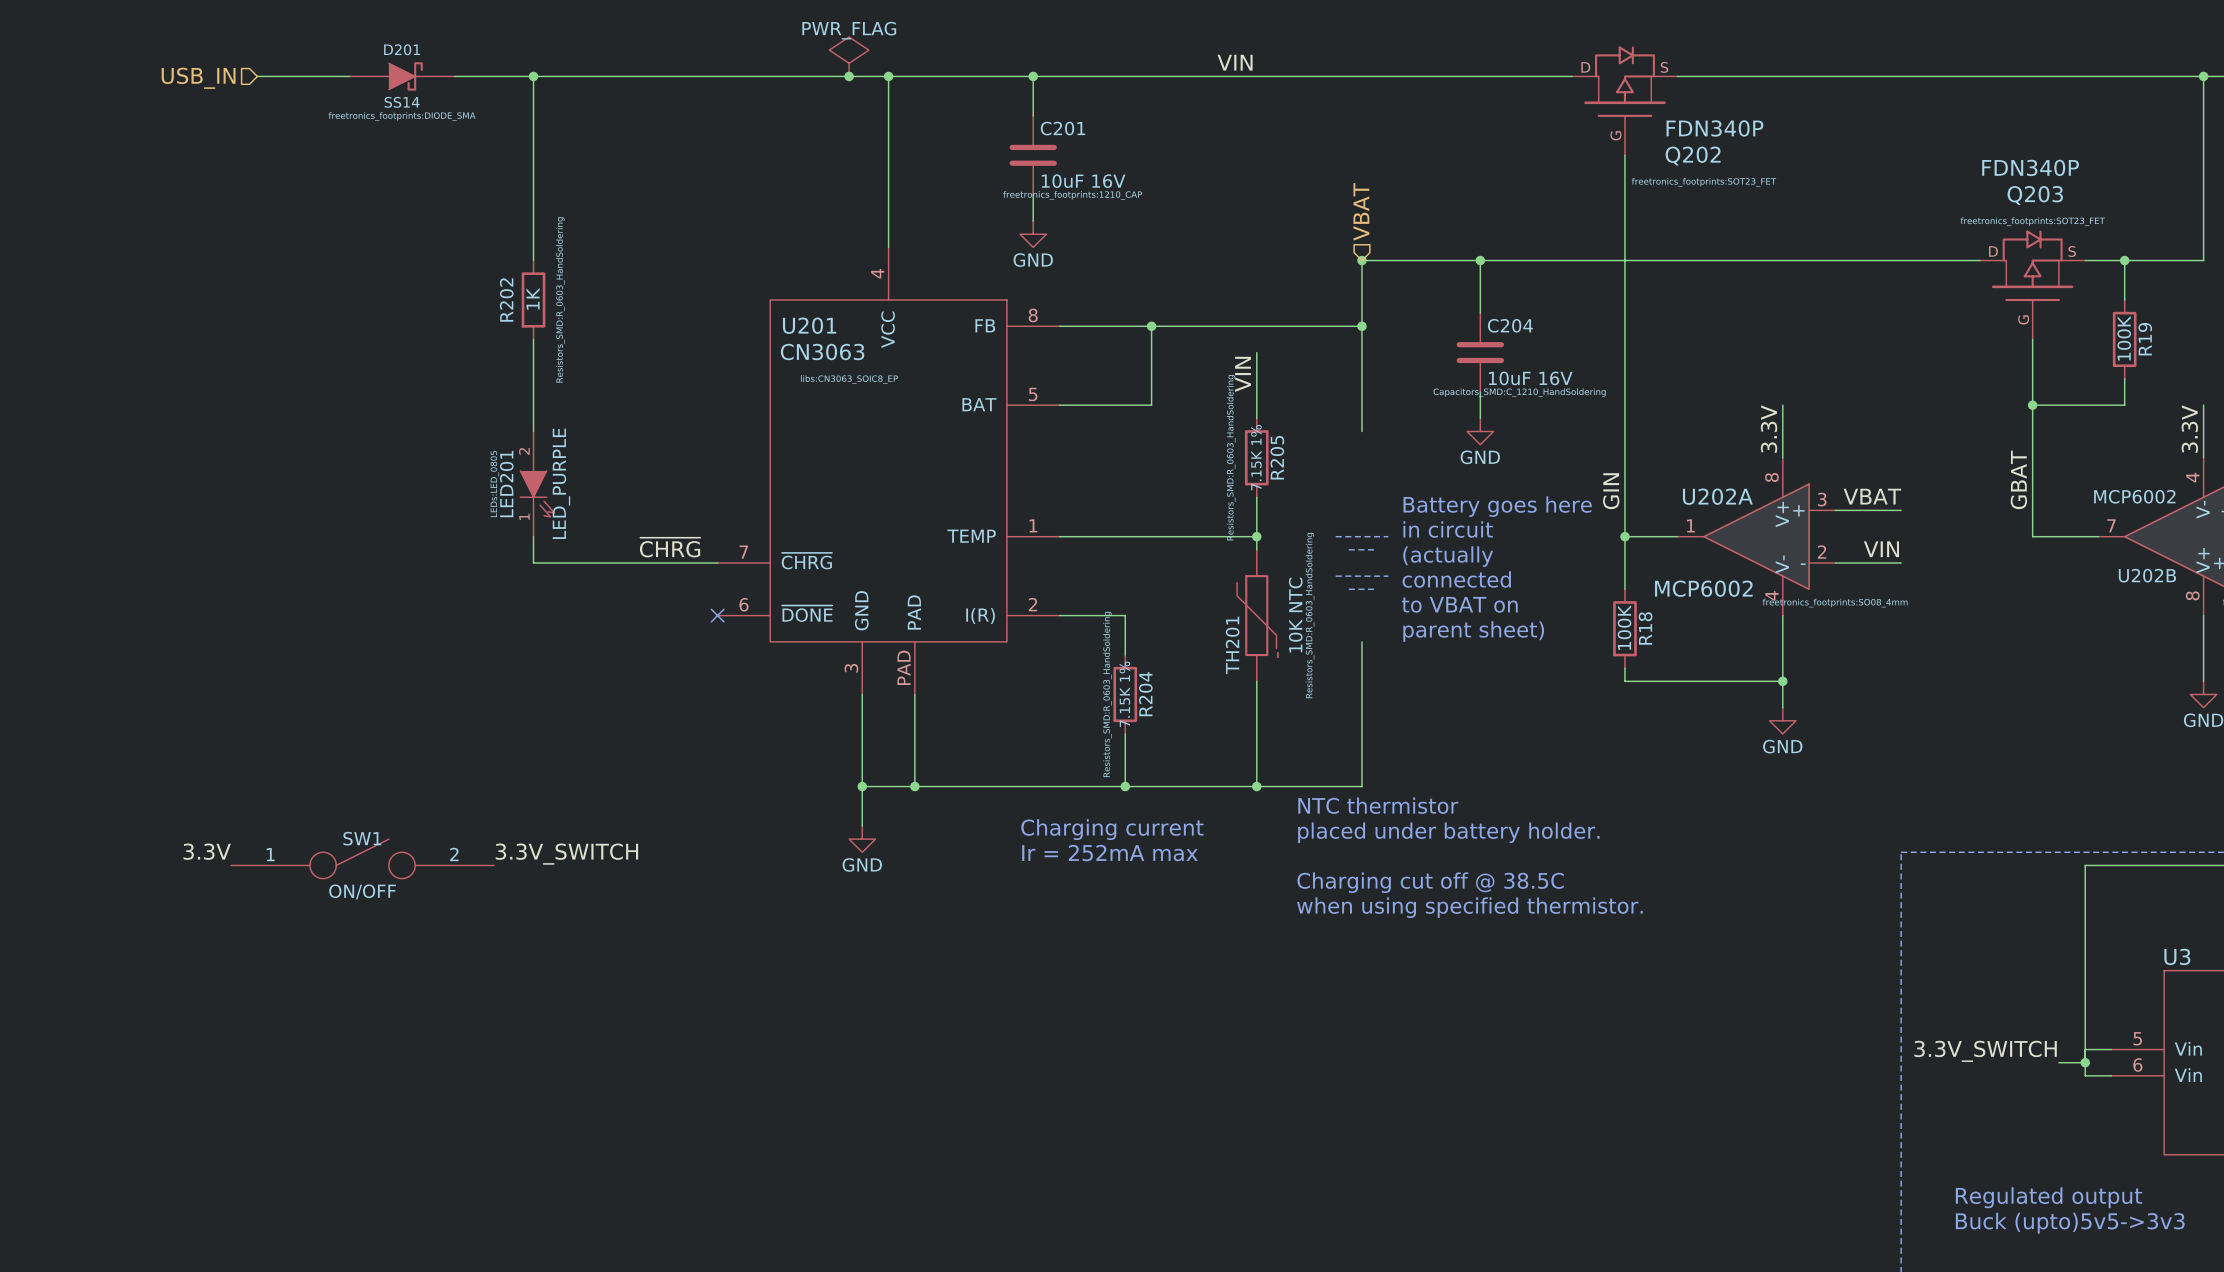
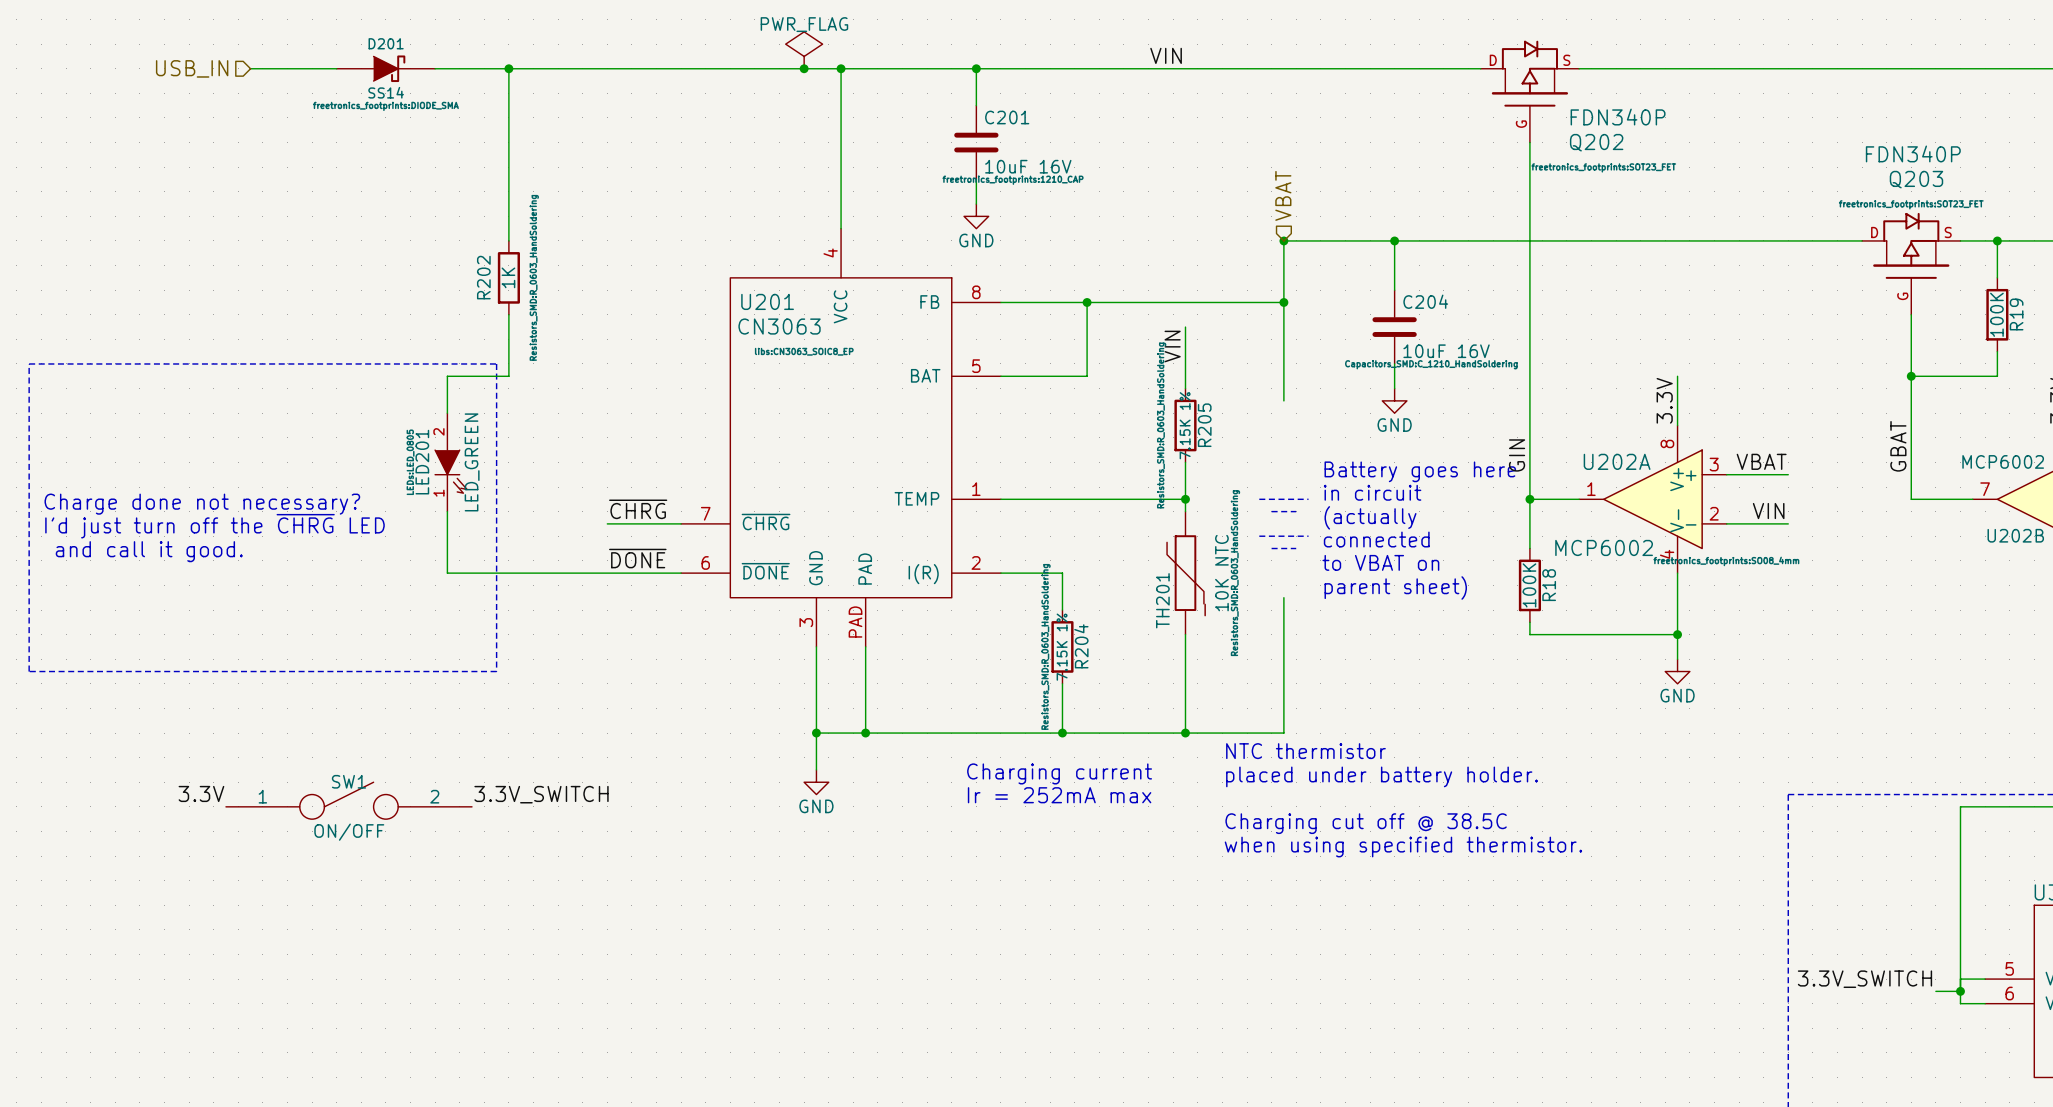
line: none -> (29, 363) (496, 363) (496, 671) (29, 671) (29, 363)
wire: (533, 405) (533, 431) -> (508, 376) (447, 376) (447, 413)
LED201 value: LED_PURPLE (561, 483) -> LED_GREEN (472, 462)
LED201 position: (537, 484) -> (451, 462)
wire: (533, 536) (533, 562) (638, 562) -> none
text: none -> Charge done not necessary? (202, 504)
wire: none -> (447, 511) (447, 573) (681, 573)
text: none -> I'd just turn off the ~{CHRG} LED (214, 526)
text: none -> and call it good. (149, 551)
label: none -> ~{DONE} (637, 558)
no-connect mark: (717, 615) -> none

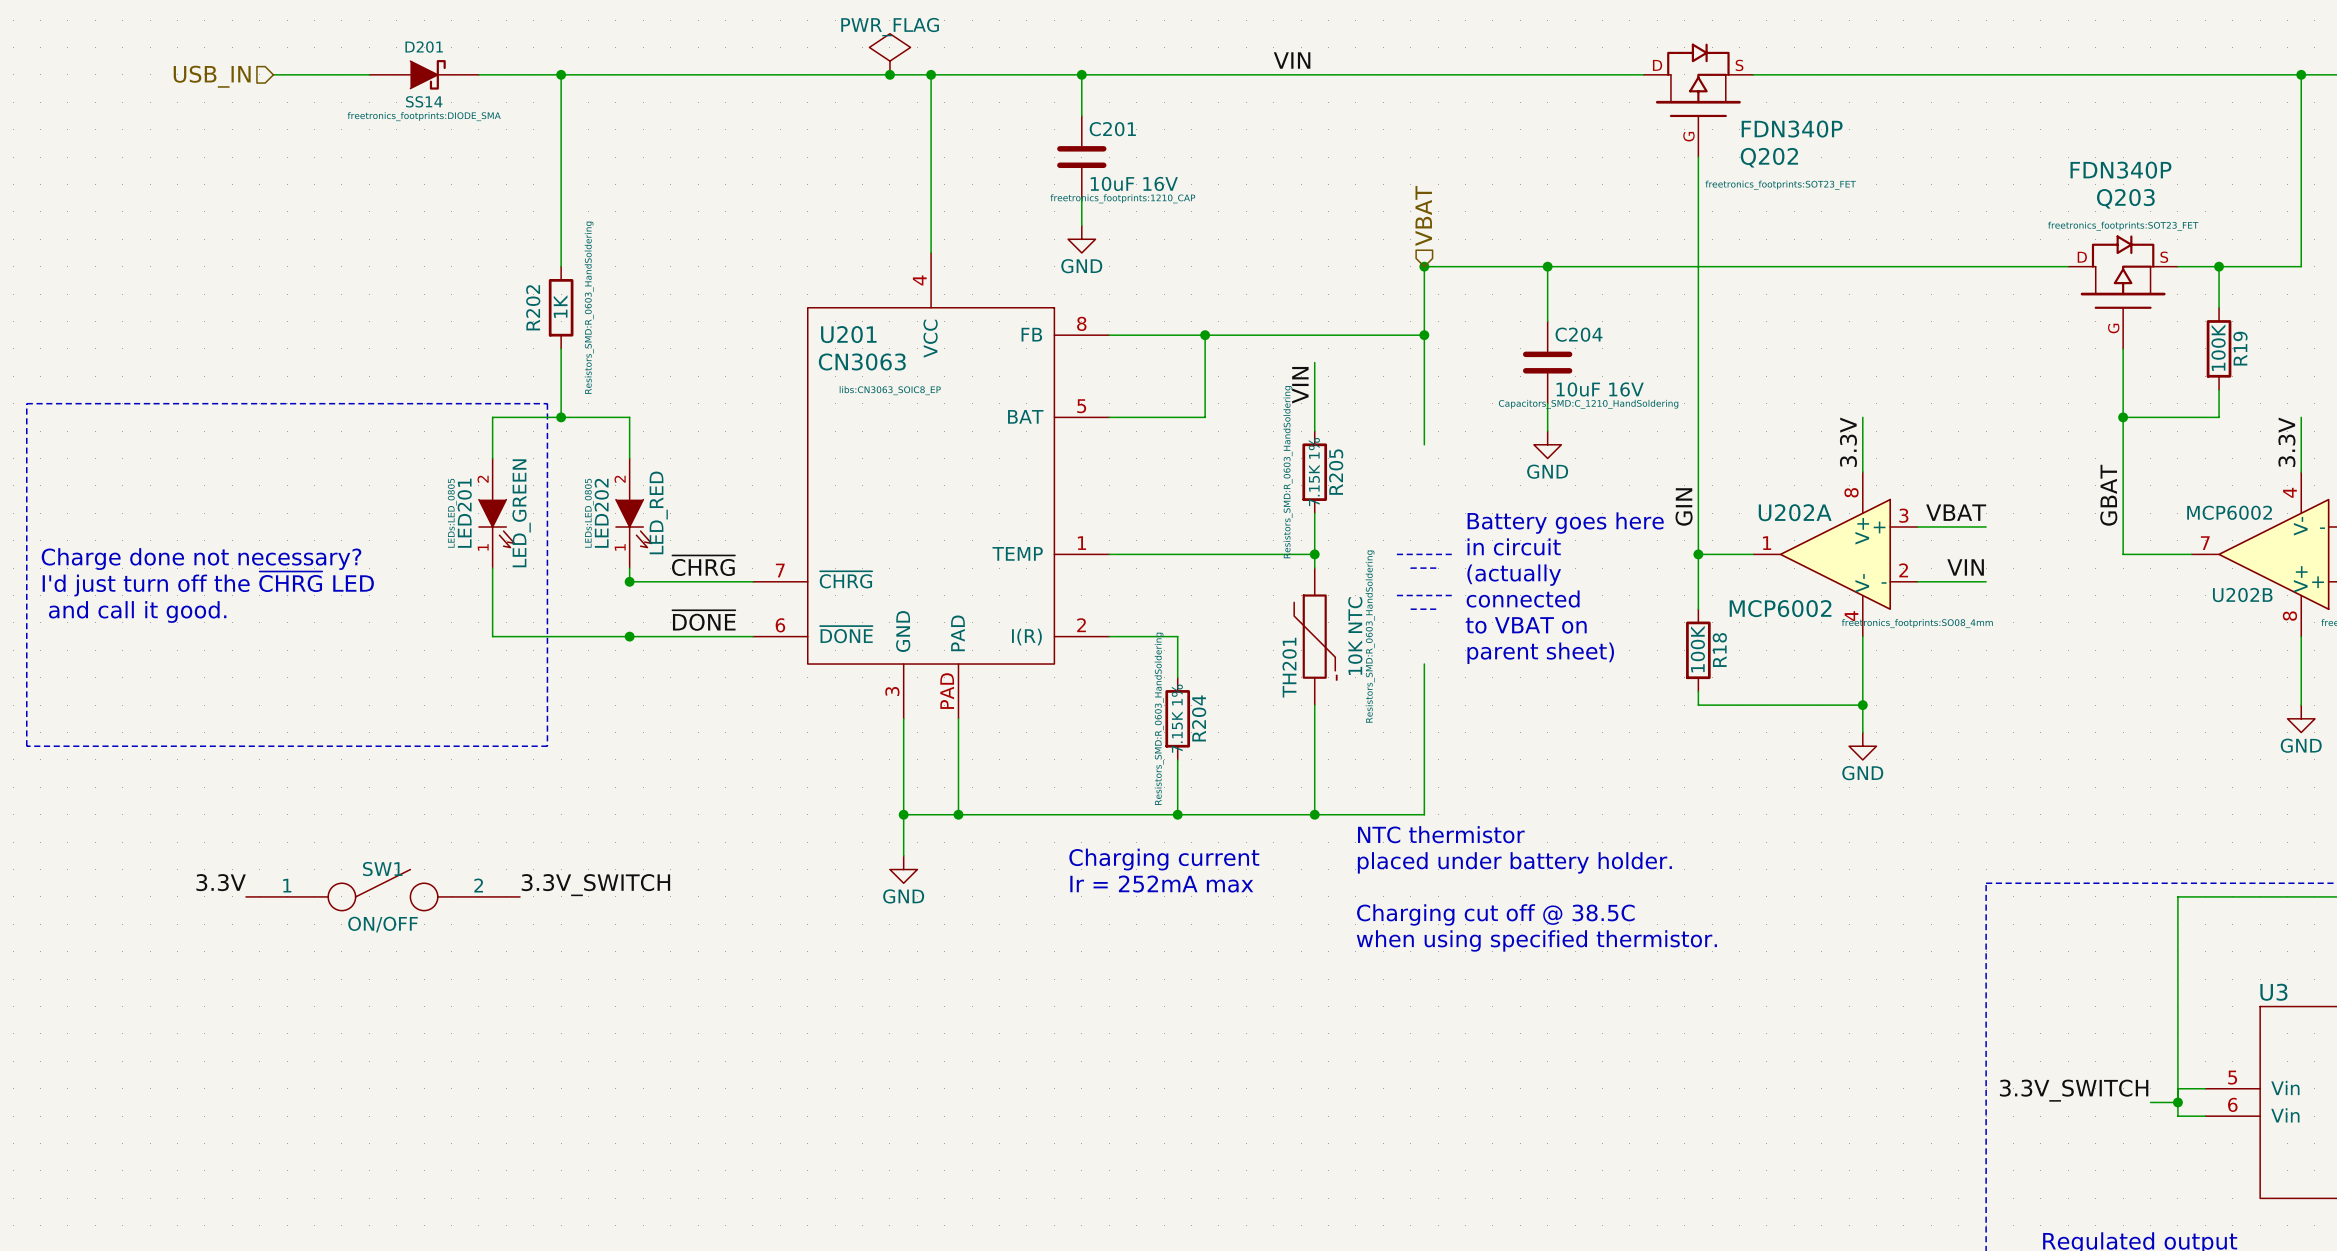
wire: none -> (561, 417) (629, 417) (629, 458)
junction: none -> (561, 417)
LED202: none -> LED_RED (633, 513)
wire: none -> (629, 568) (629, 581) (670, 581)
junction: none -> (629, 581)
junction: none -> (629, 636)

